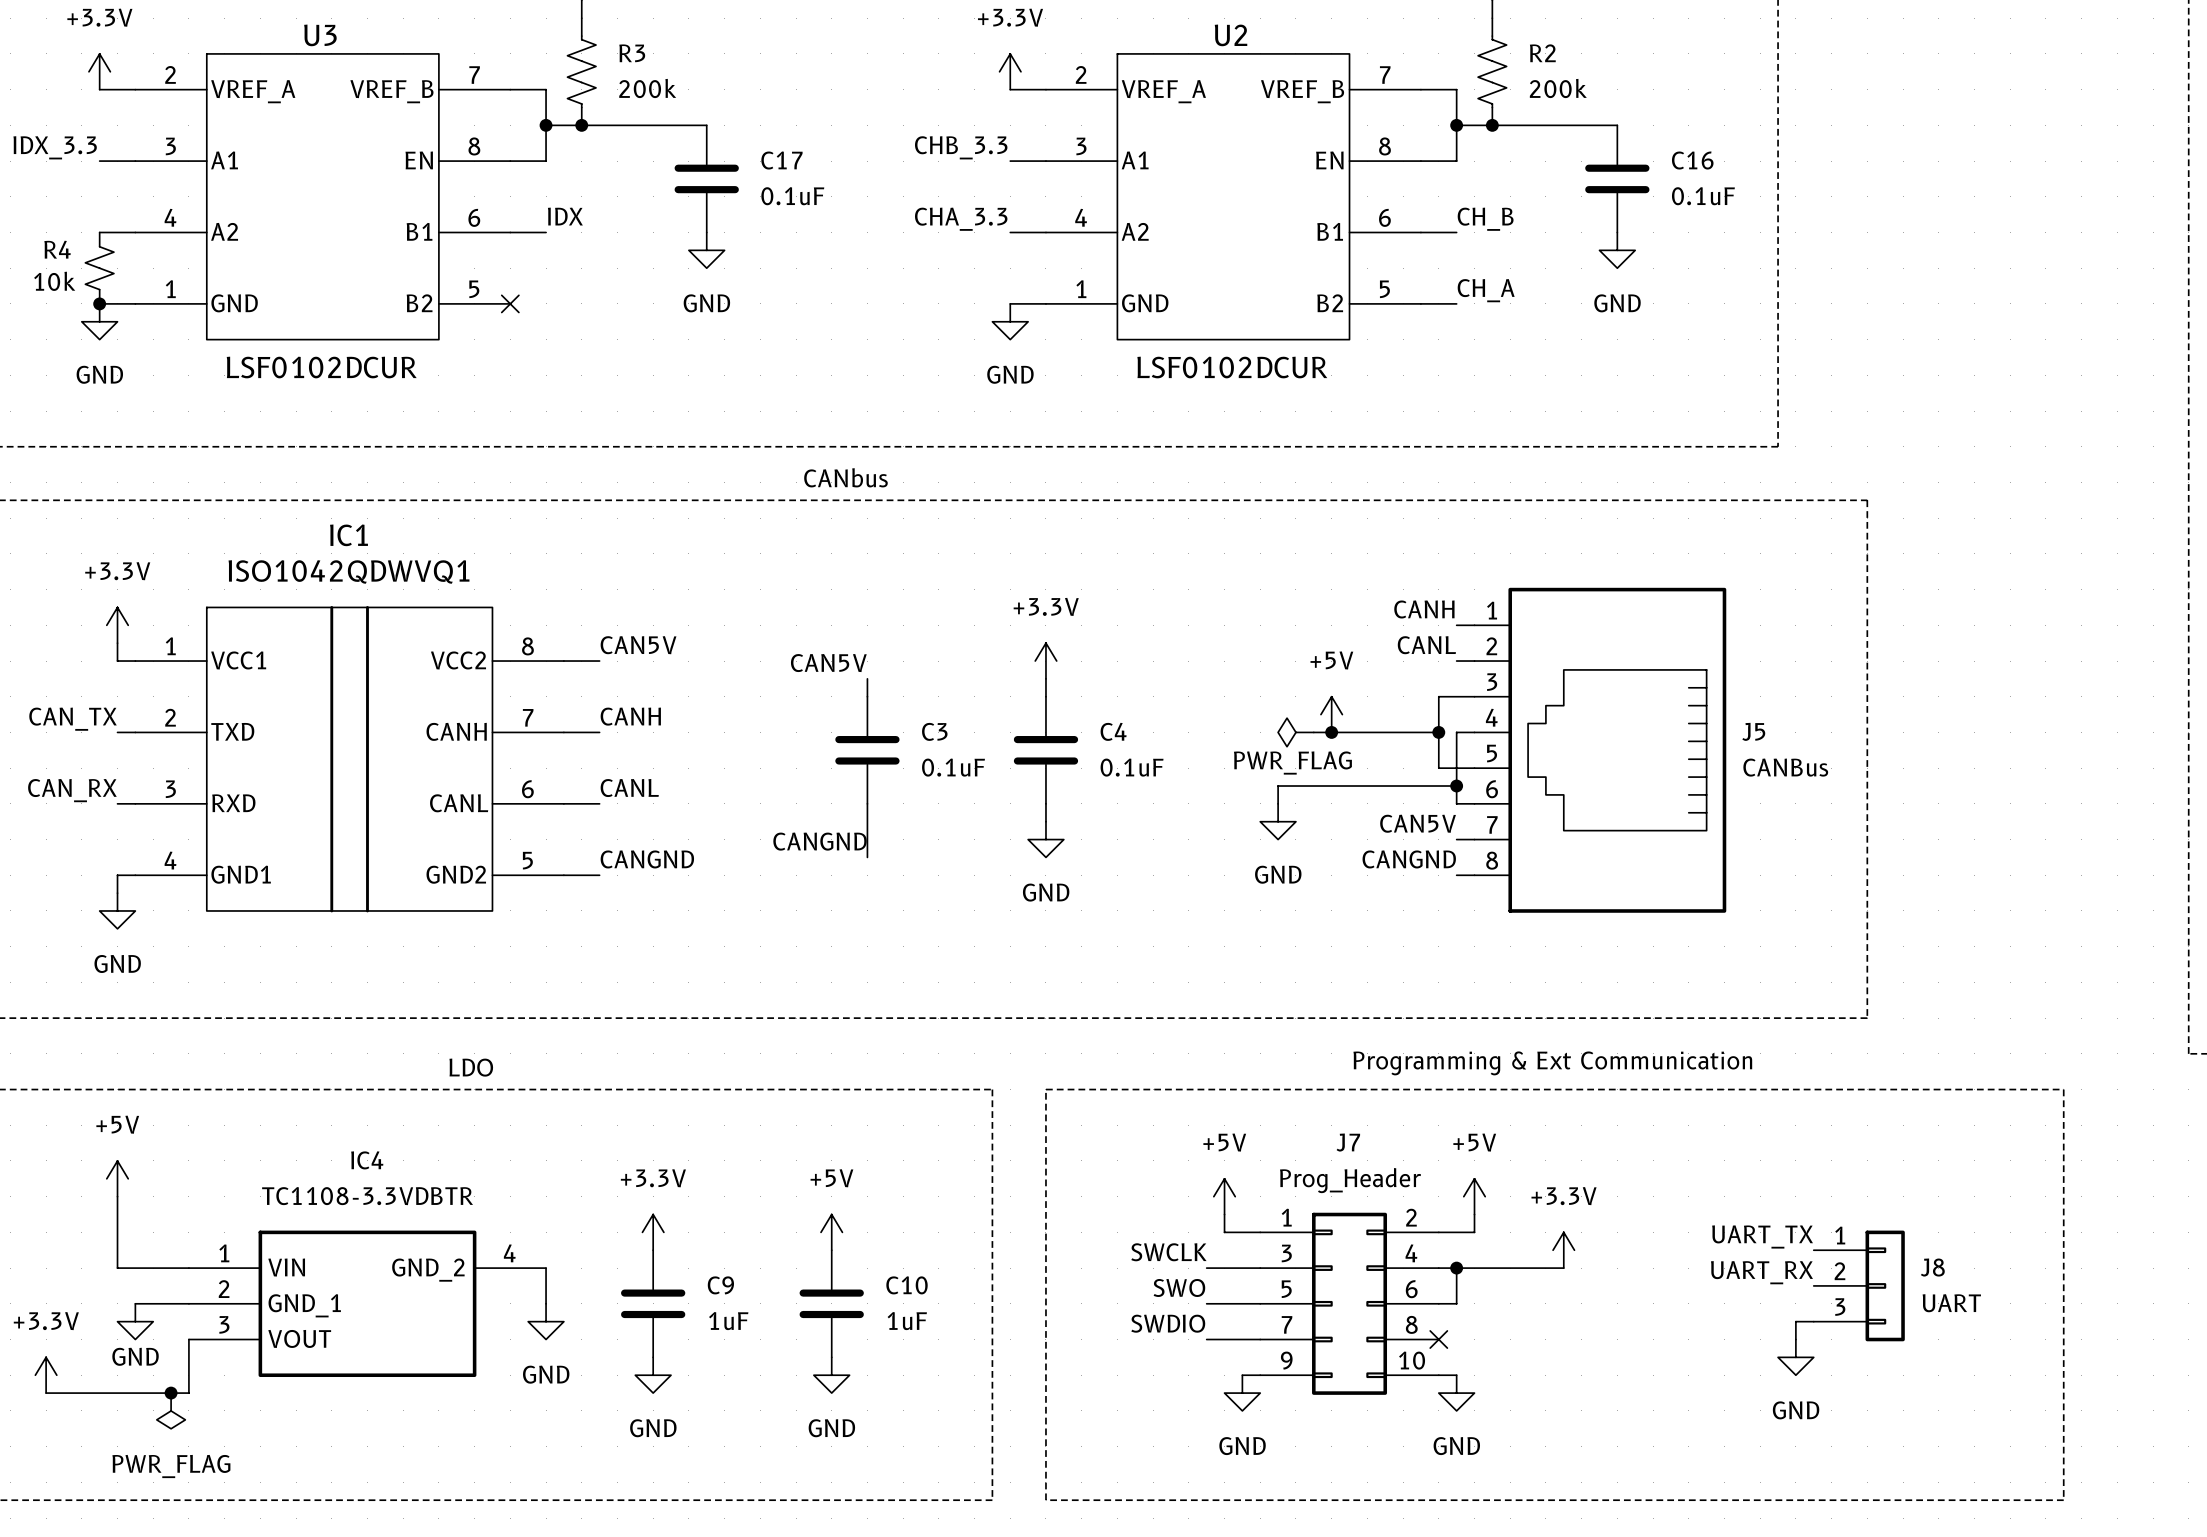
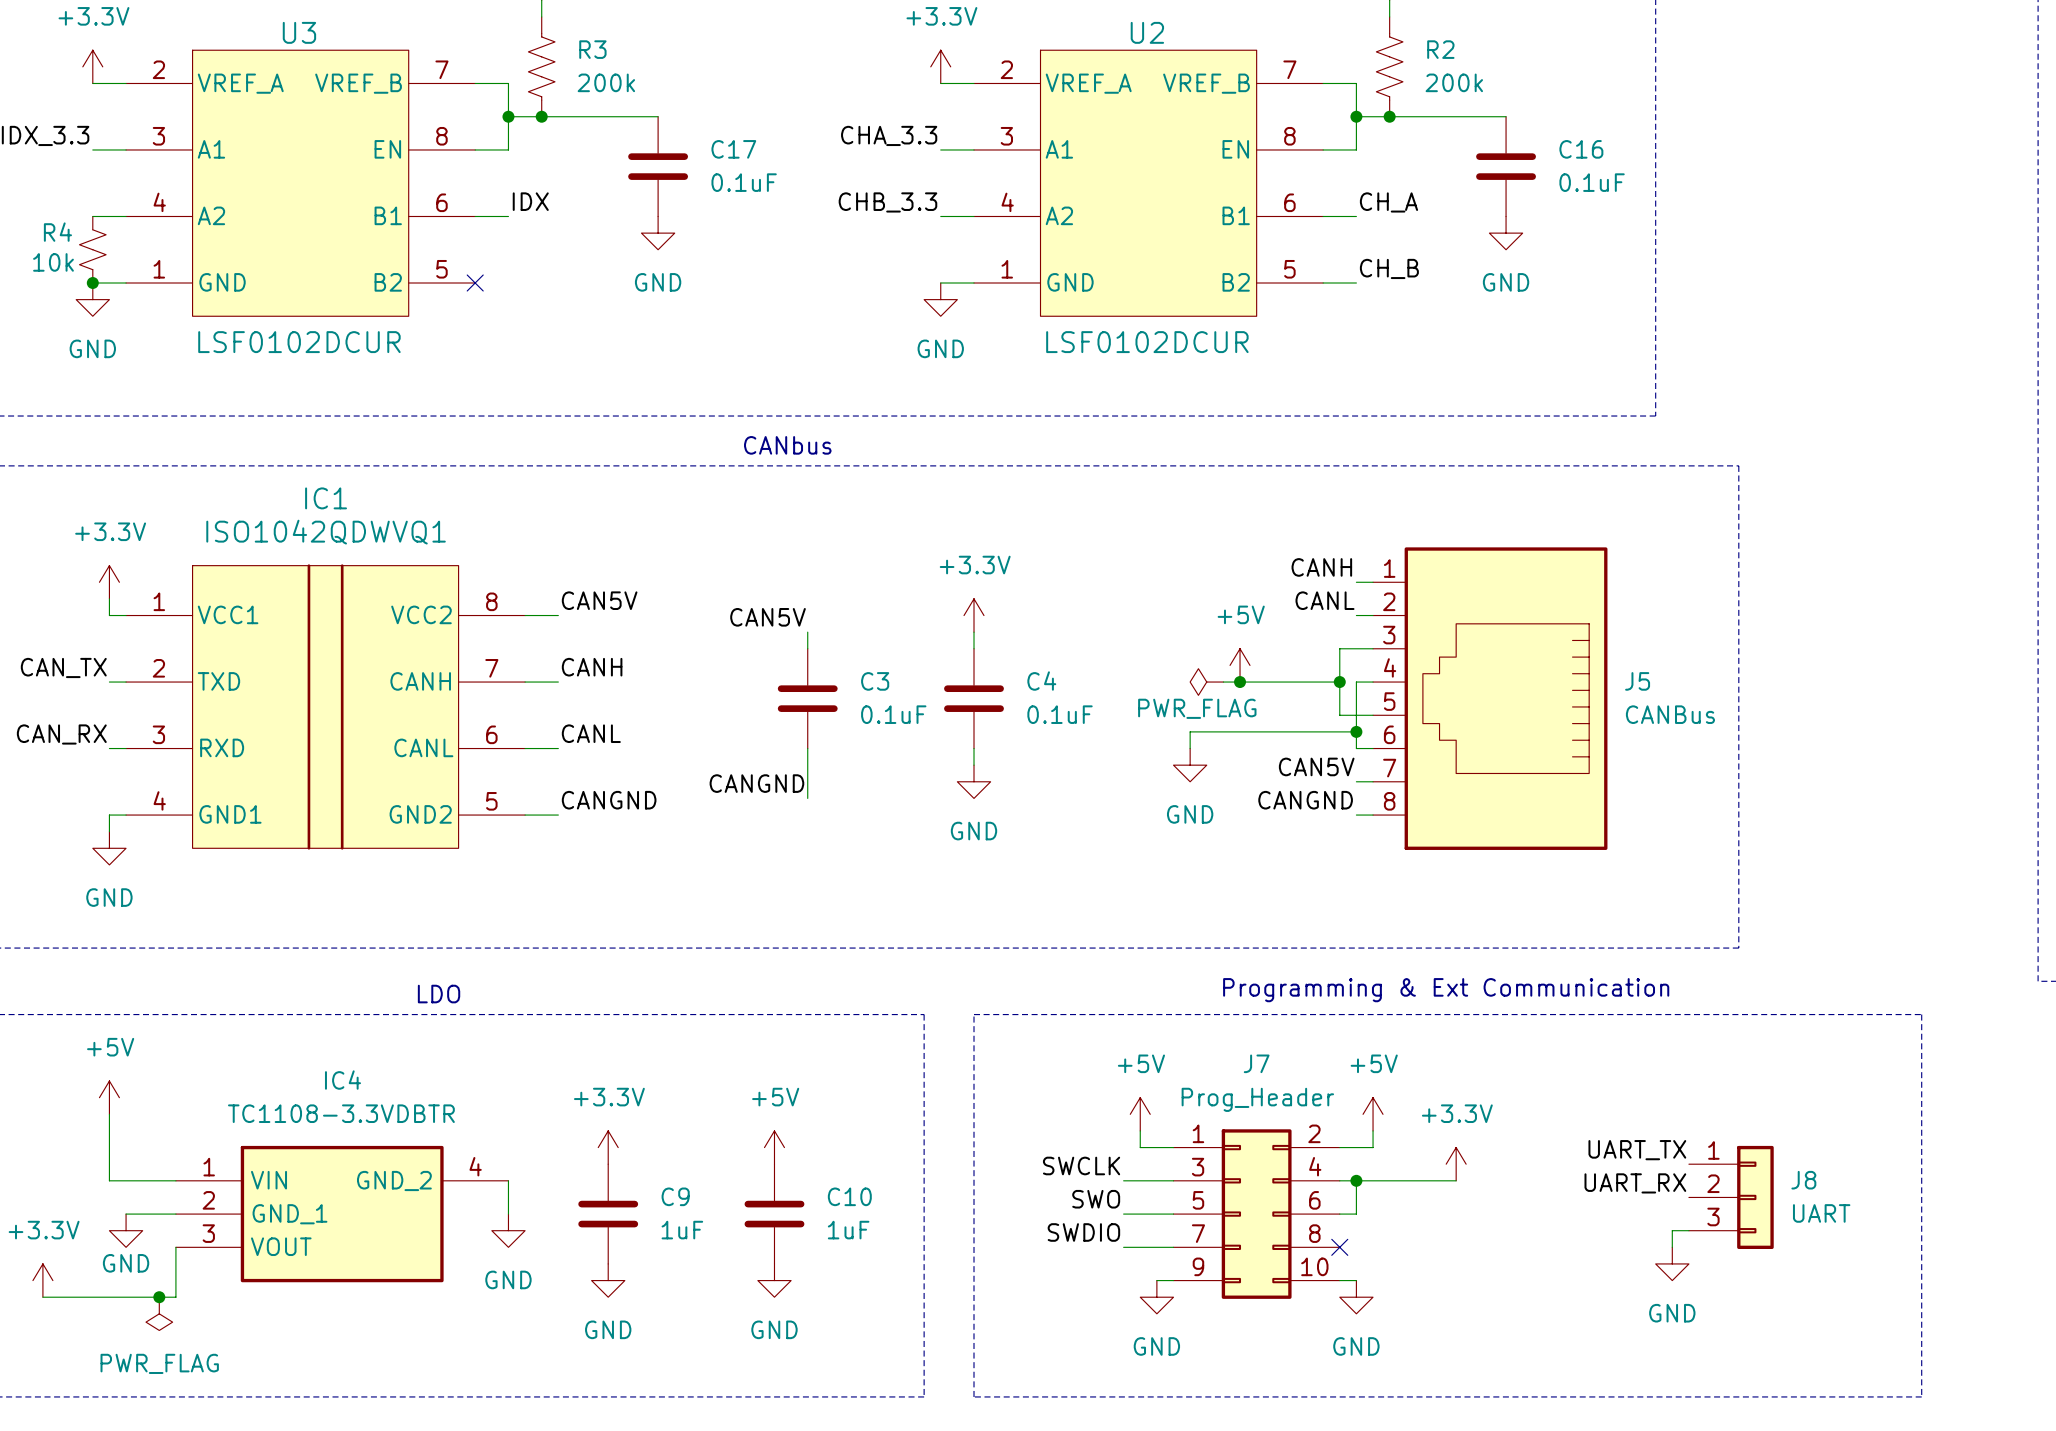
label: CHB_3.3 (961, 147) -> CHA_3.3 (889, 135)
label: CHA_3.3 (961, 219) -> CHB_3.3 (887, 202)
label: CH_B (1485, 219) -> CH_A (1388, 202)
label: CH_A (1486, 290) -> CH_B (1389, 268)

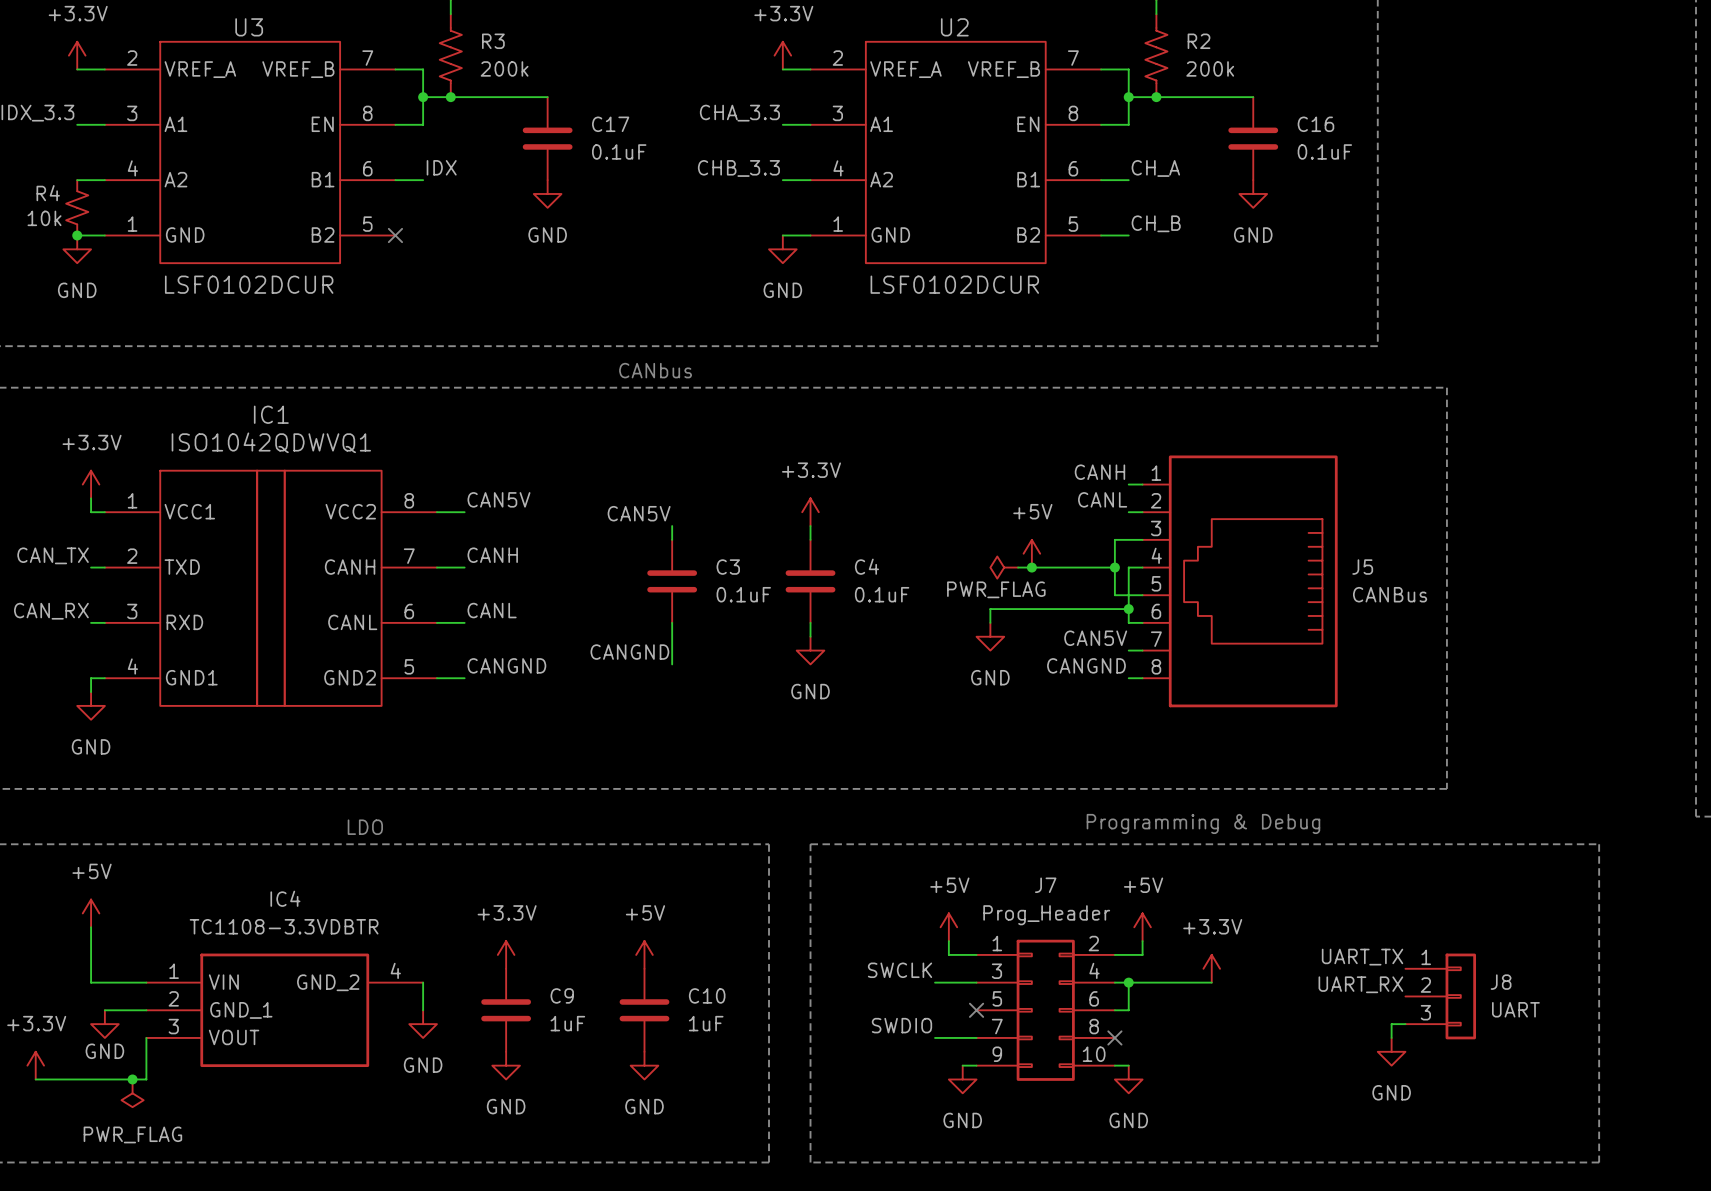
text: Programming & Ext Communication (1446, 990) -> Programming & Debug (1203, 823)
label: SWO (1096, 1199) -> none
wire: (1123, 1214) (1173, 1214) -> none
no-connect mark: none -> (976, 1010)

